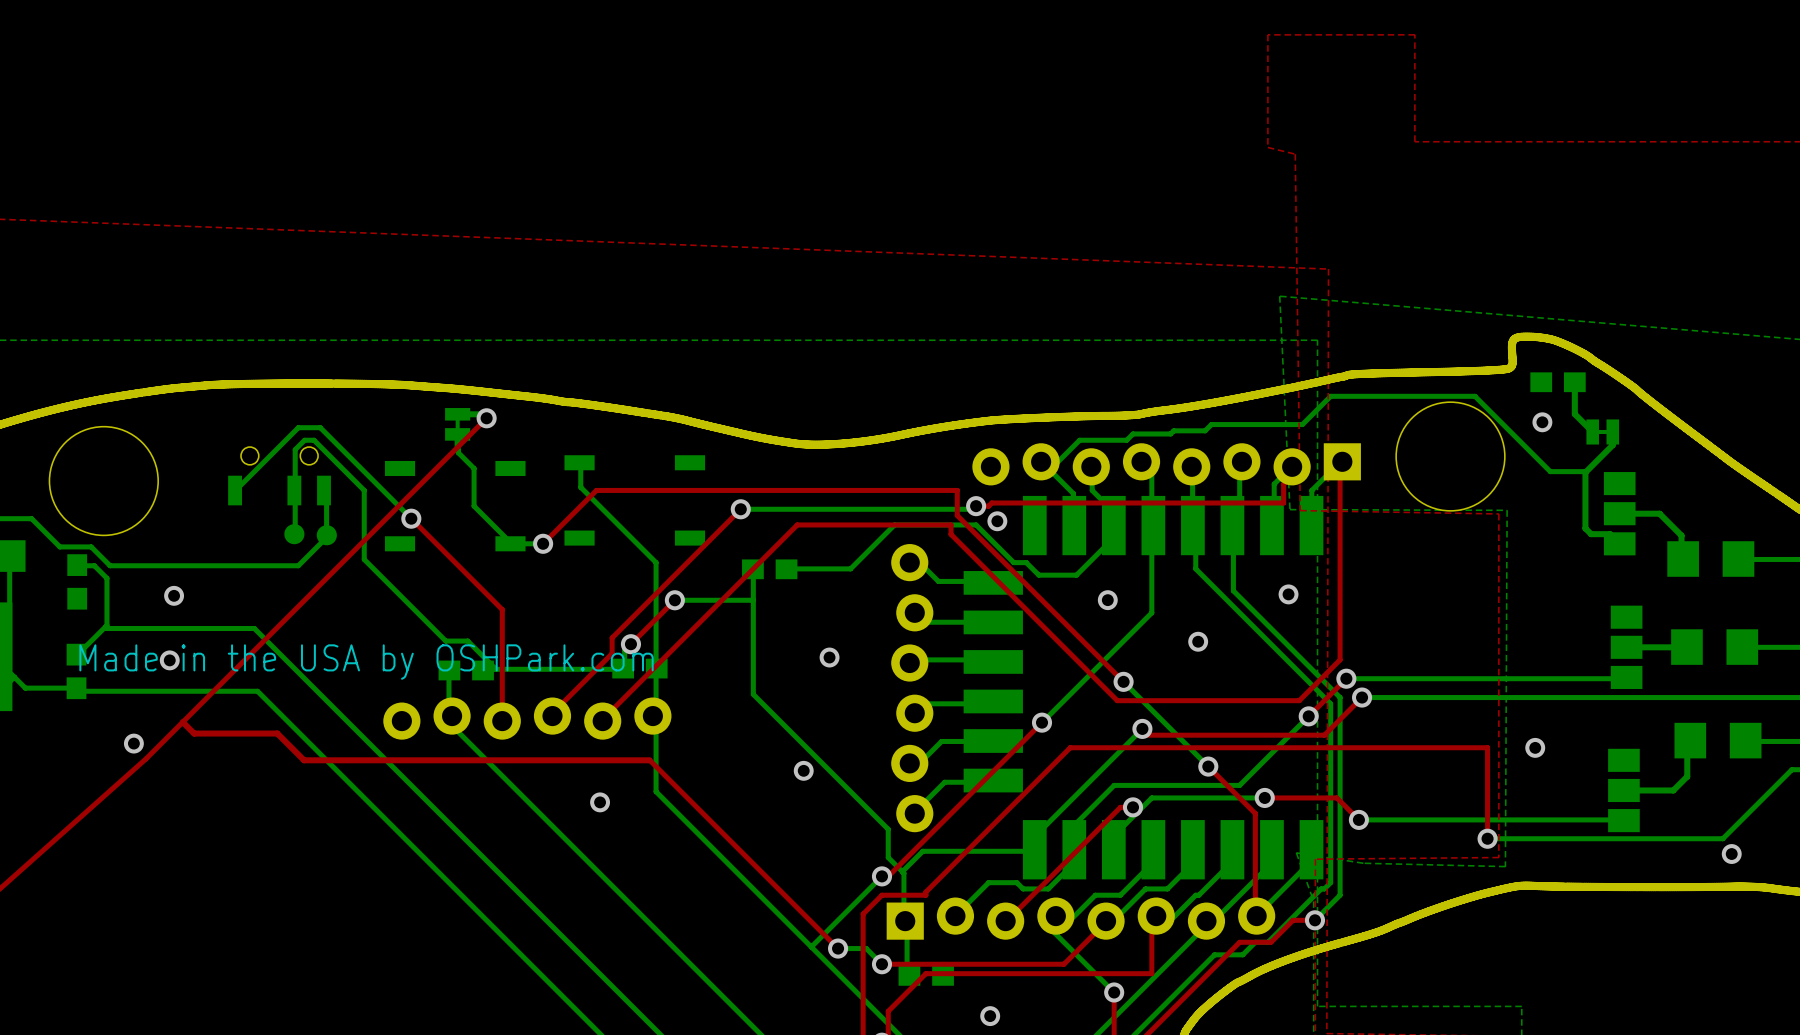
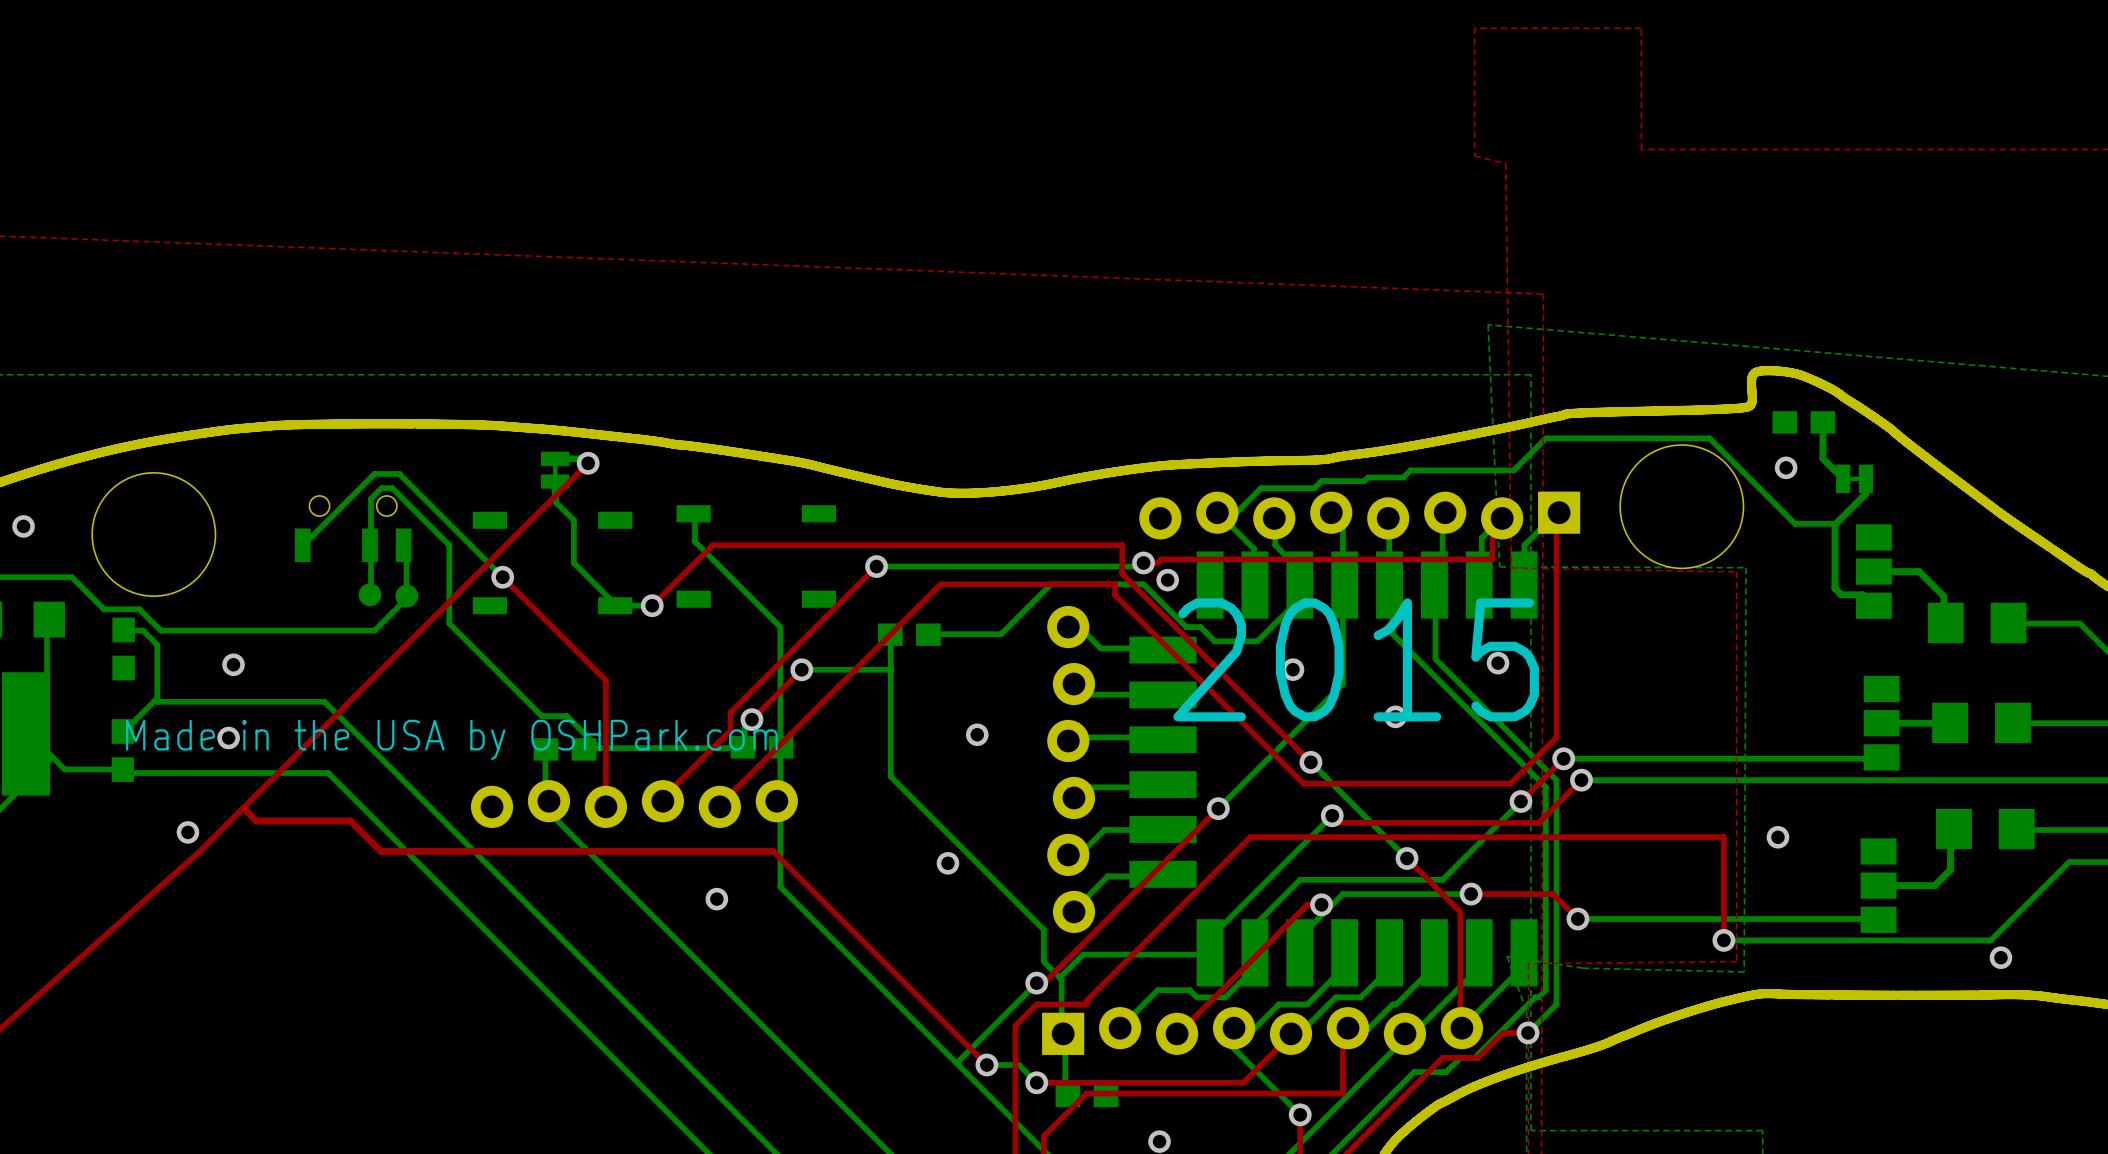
text: none -> 2015 (1356, 659)

